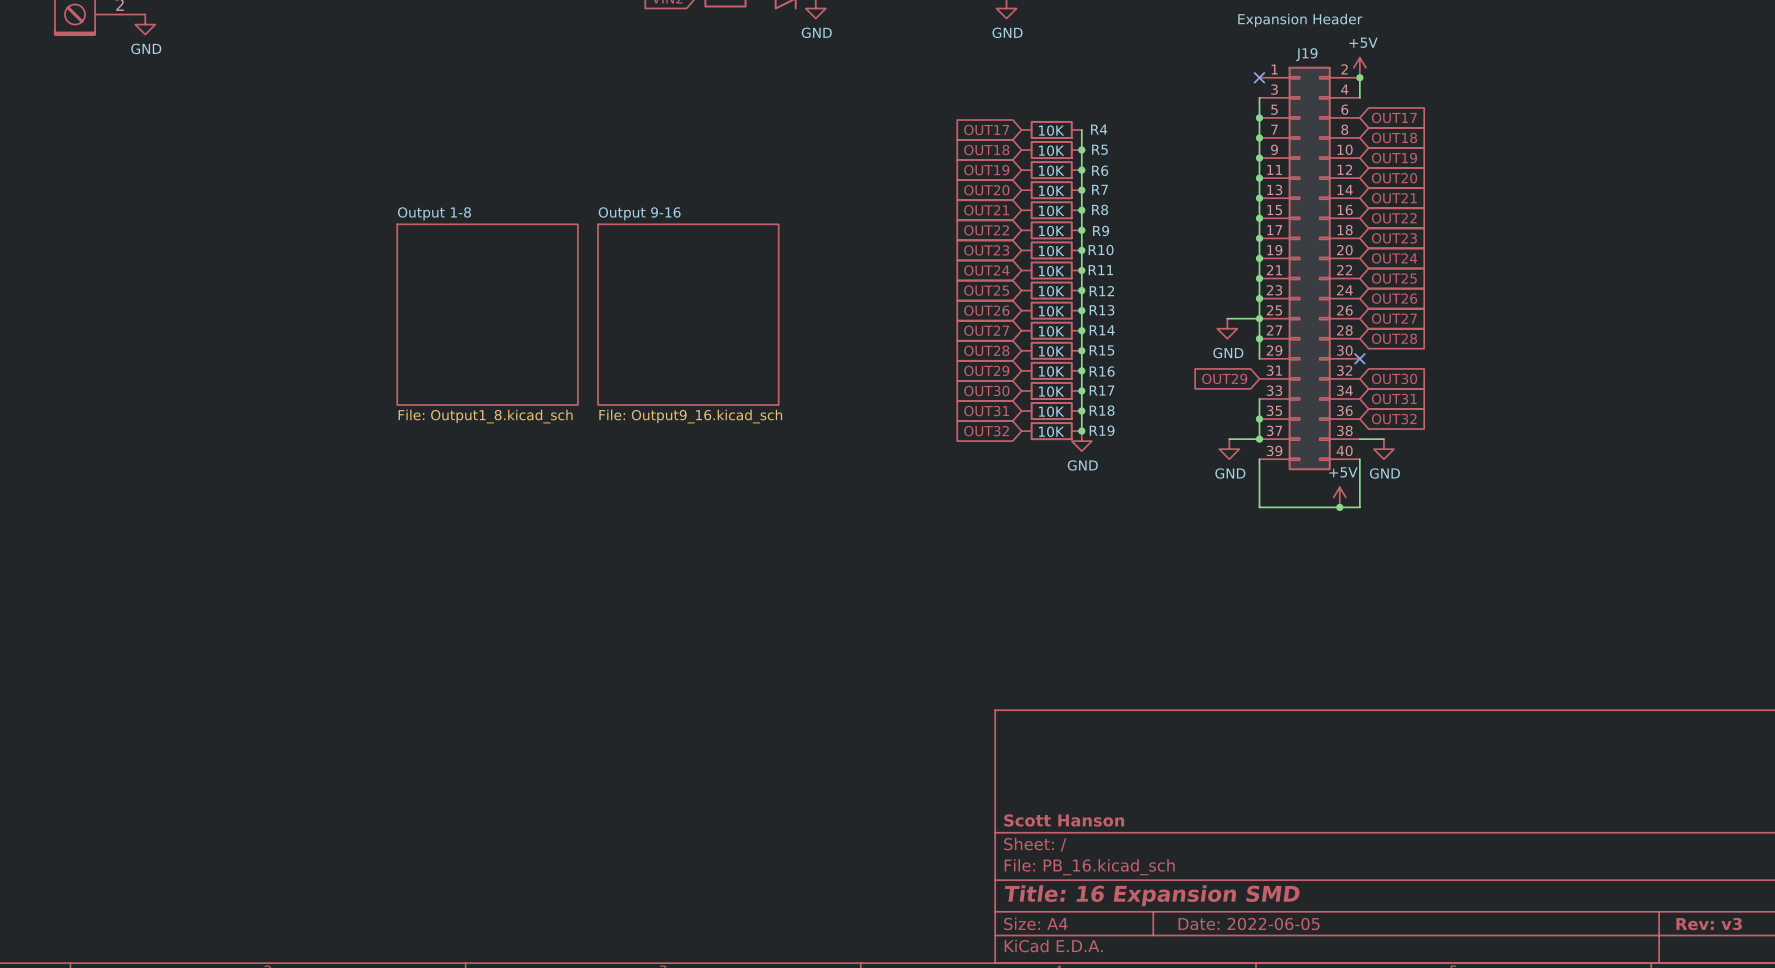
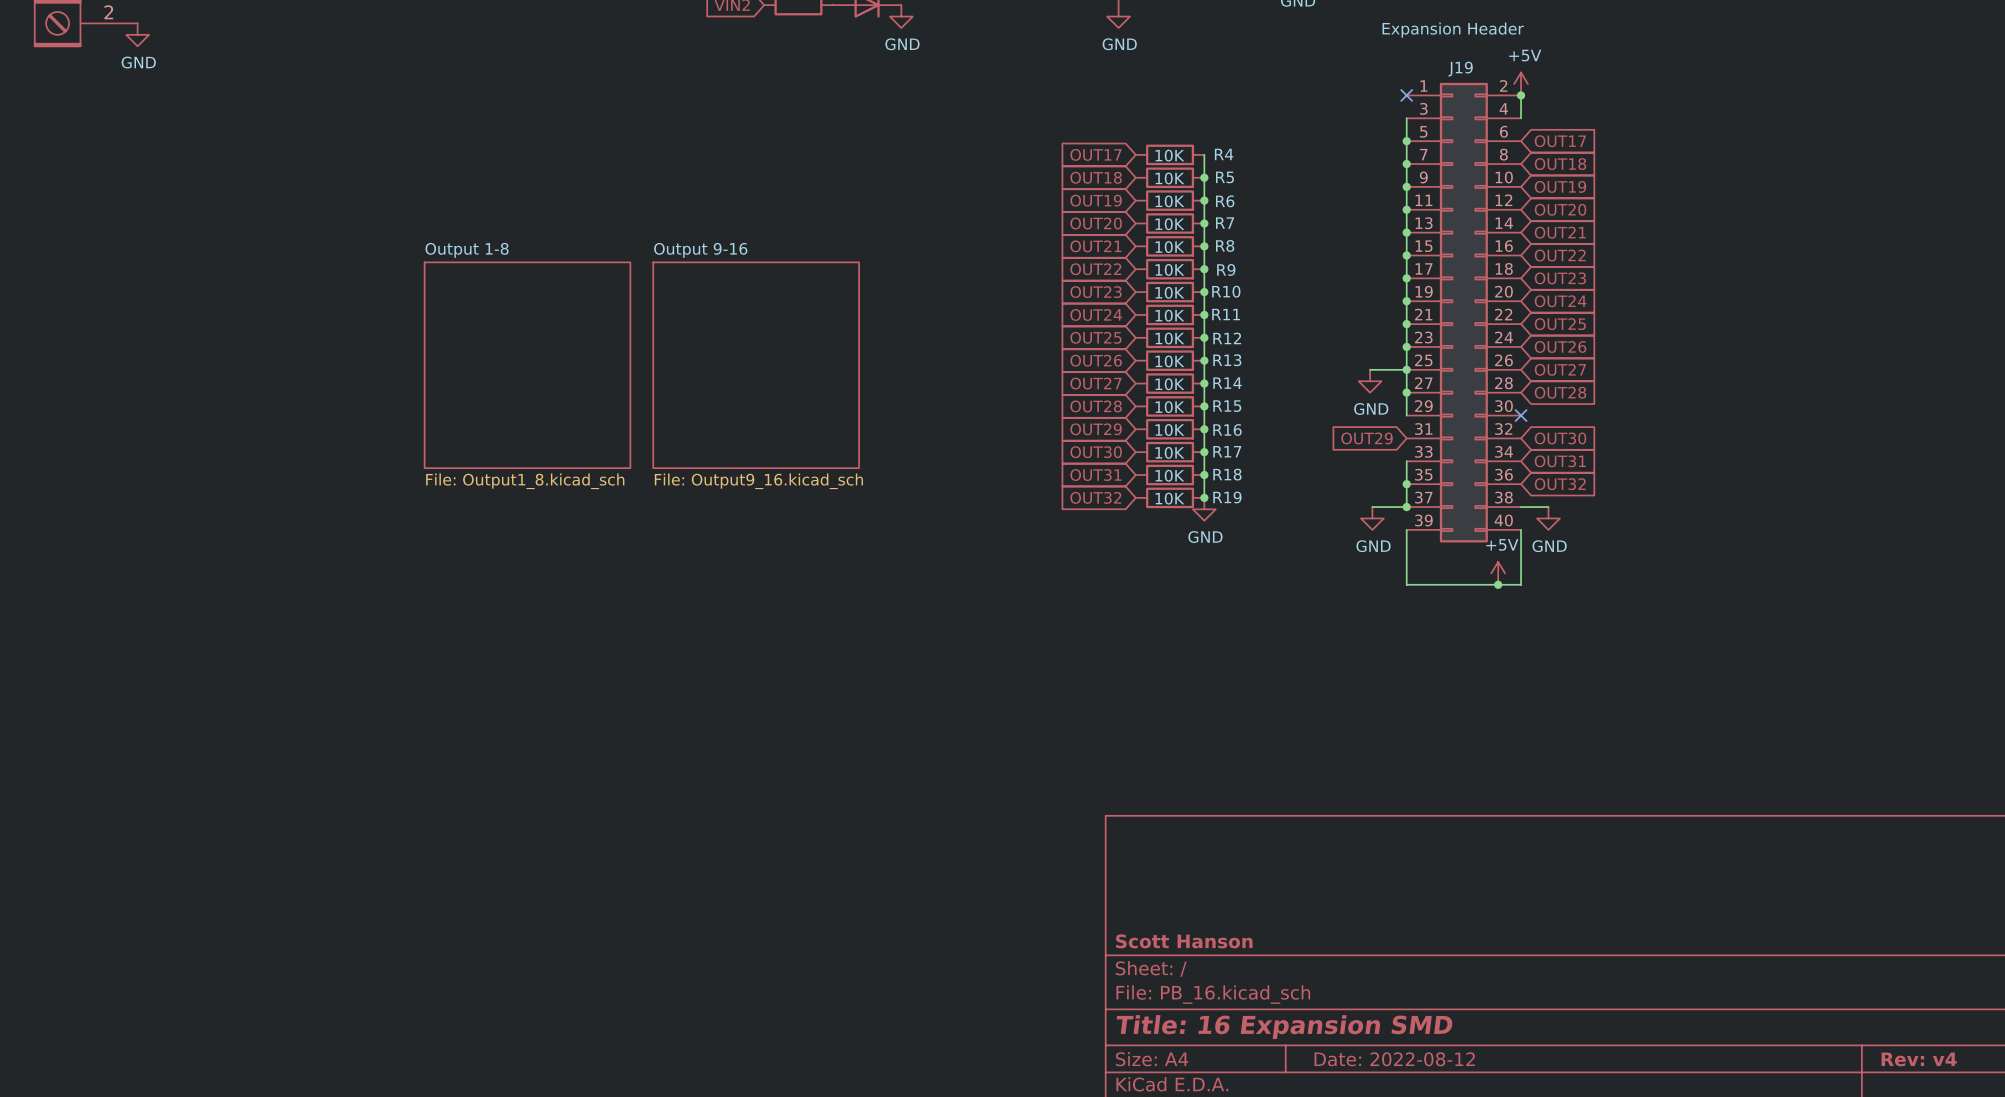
title block: Date: 2022-06-05 (1249, 924) -> Date: 2022-08-12 (1394, 1059)
title block: Rev: v3 (1709, 924) -> Rev: v4 (1919, 1059)

